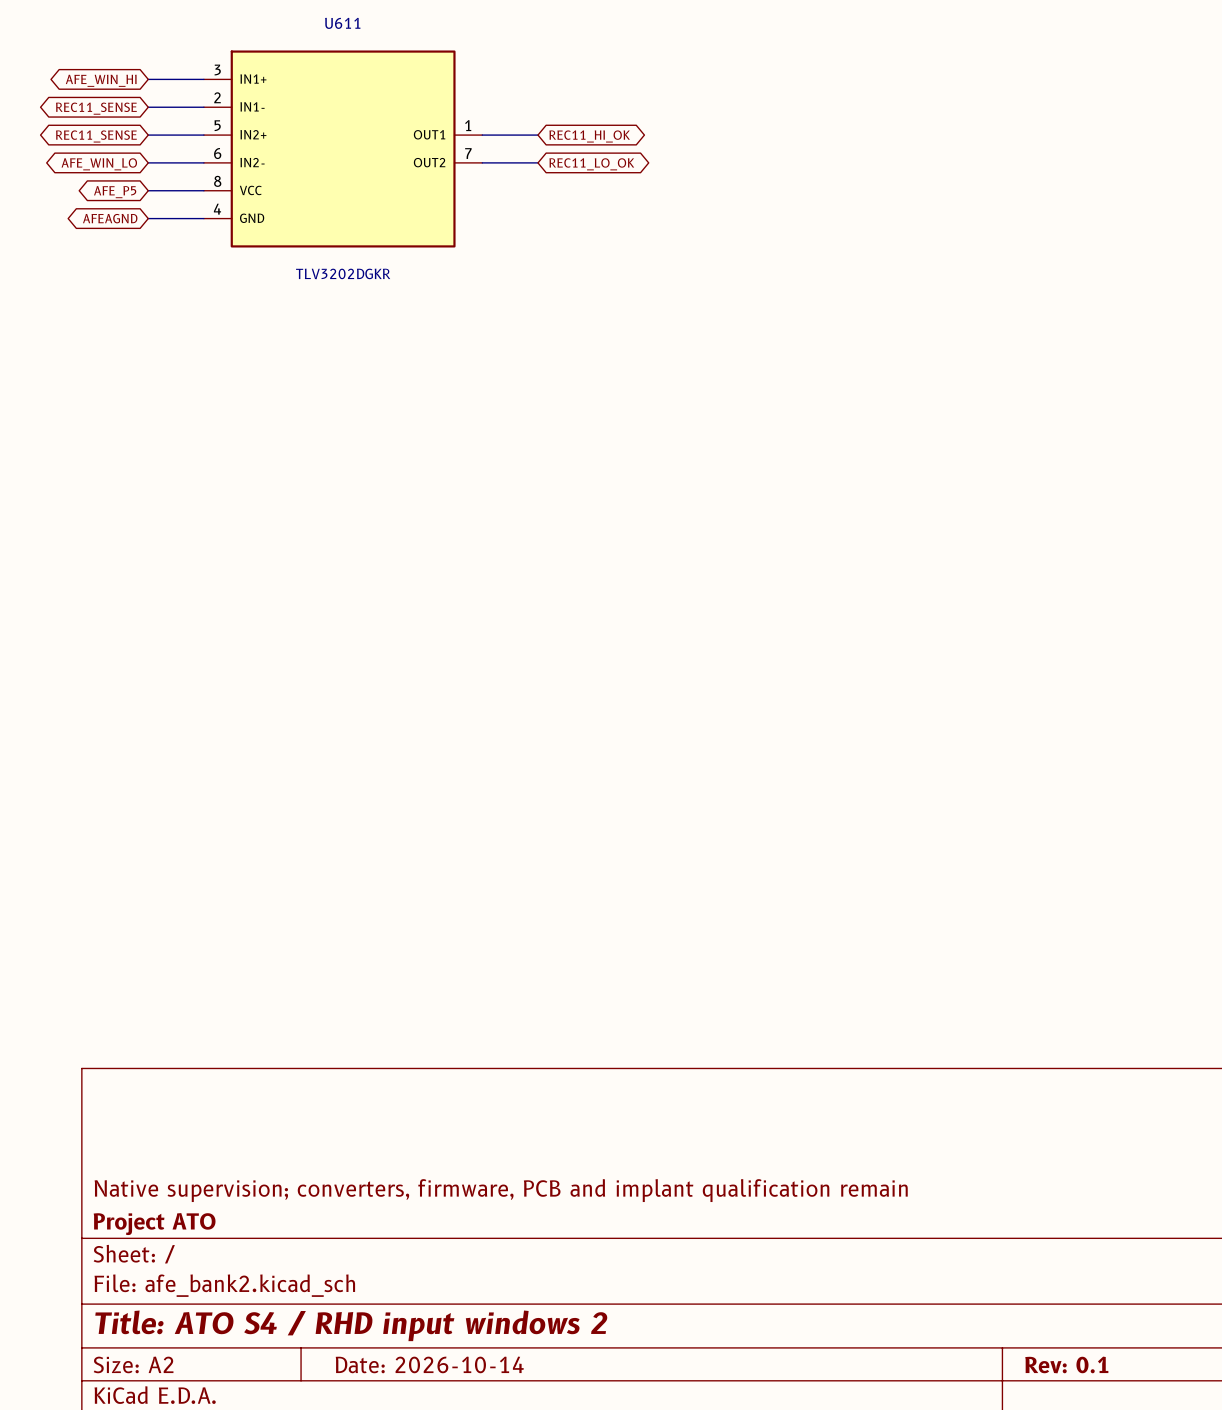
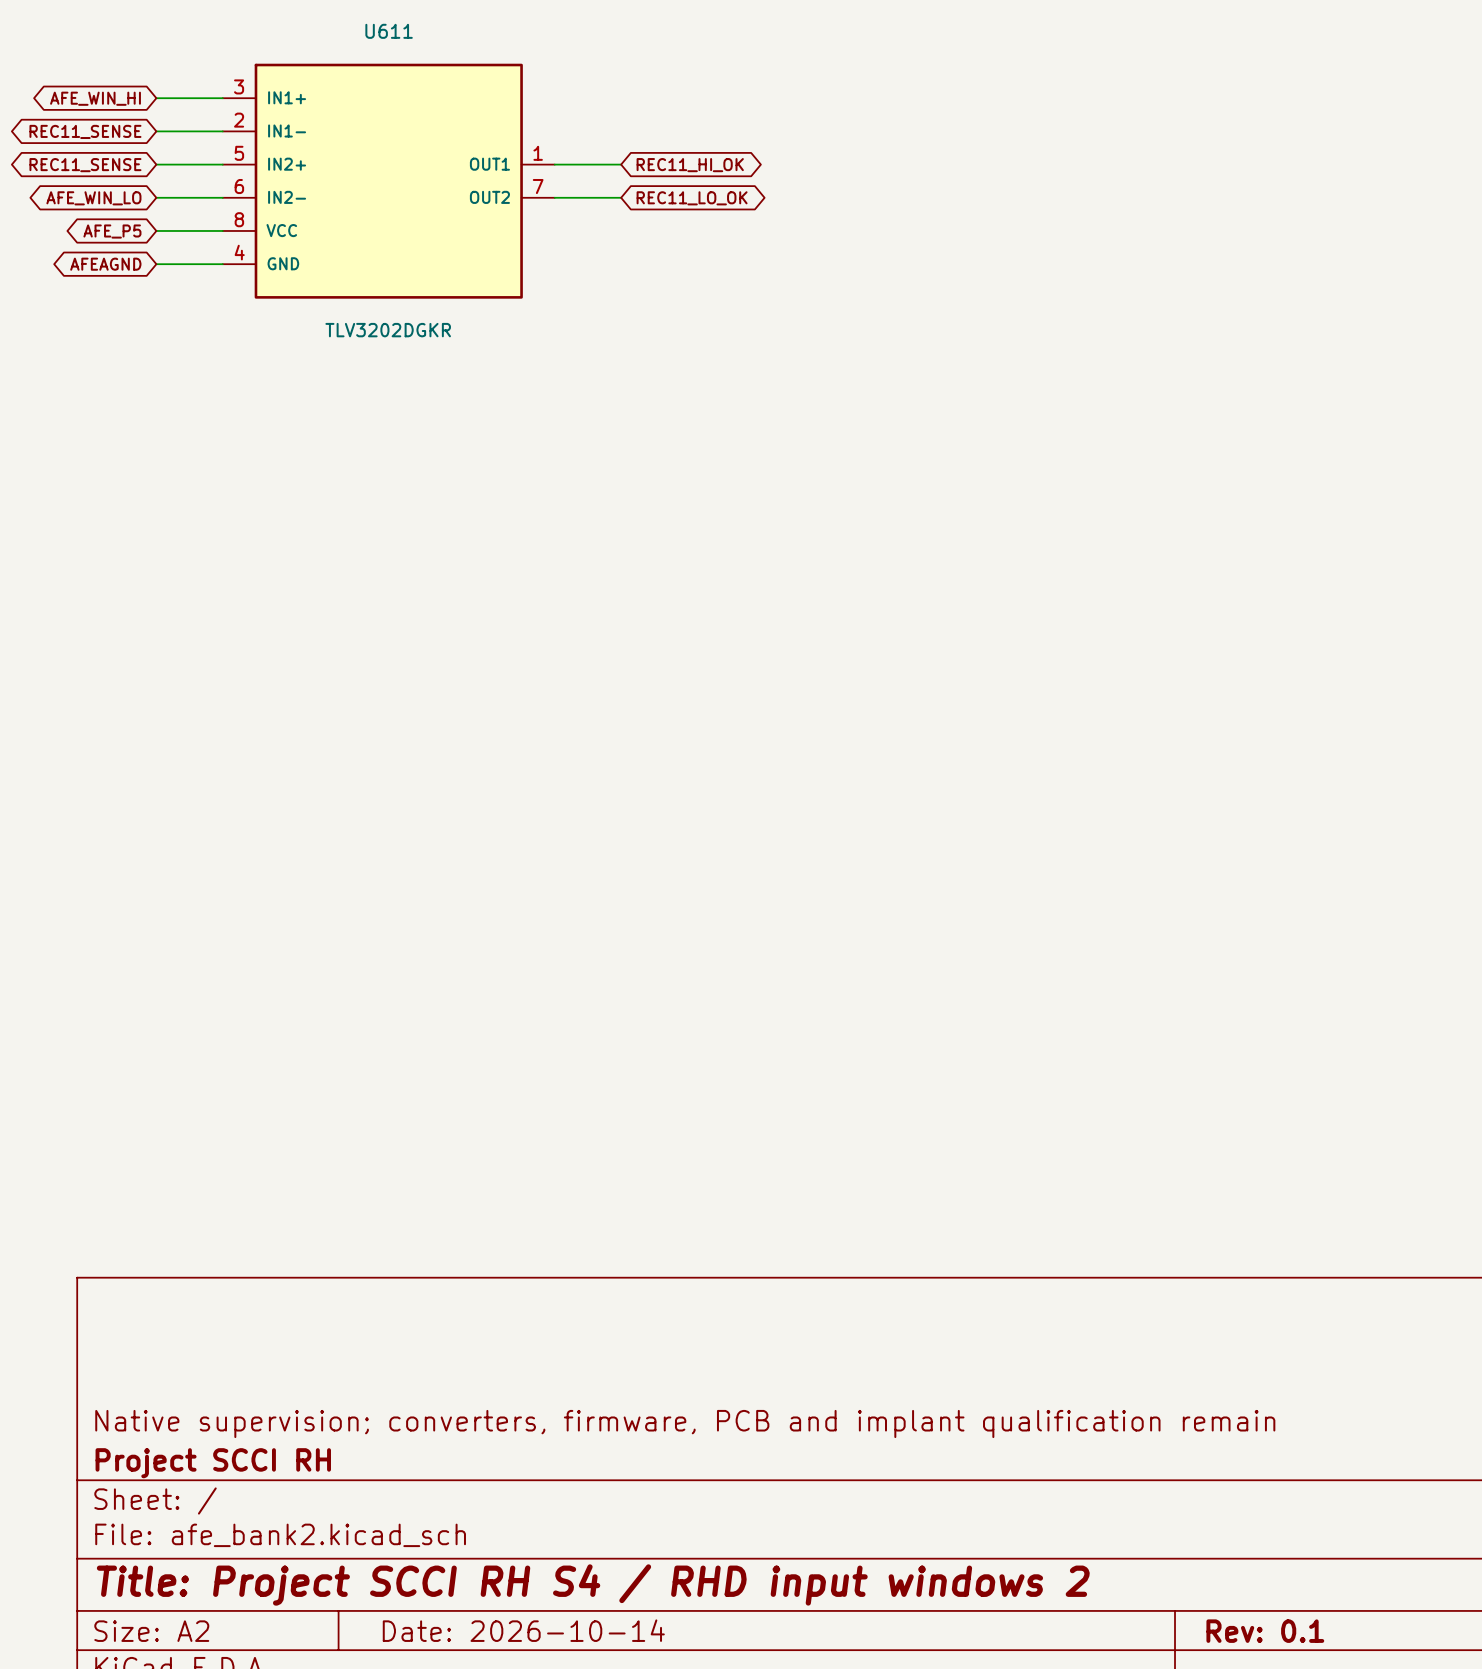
title block: Project ATO (154, 1224) -> Project SCCI RH (213, 1463)
title block: Title: ATO S4 / RHD input windows 2 (351, 1325) -> Title: Project SCCI RH S4 / RHD input windows 2 (593, 1584)

